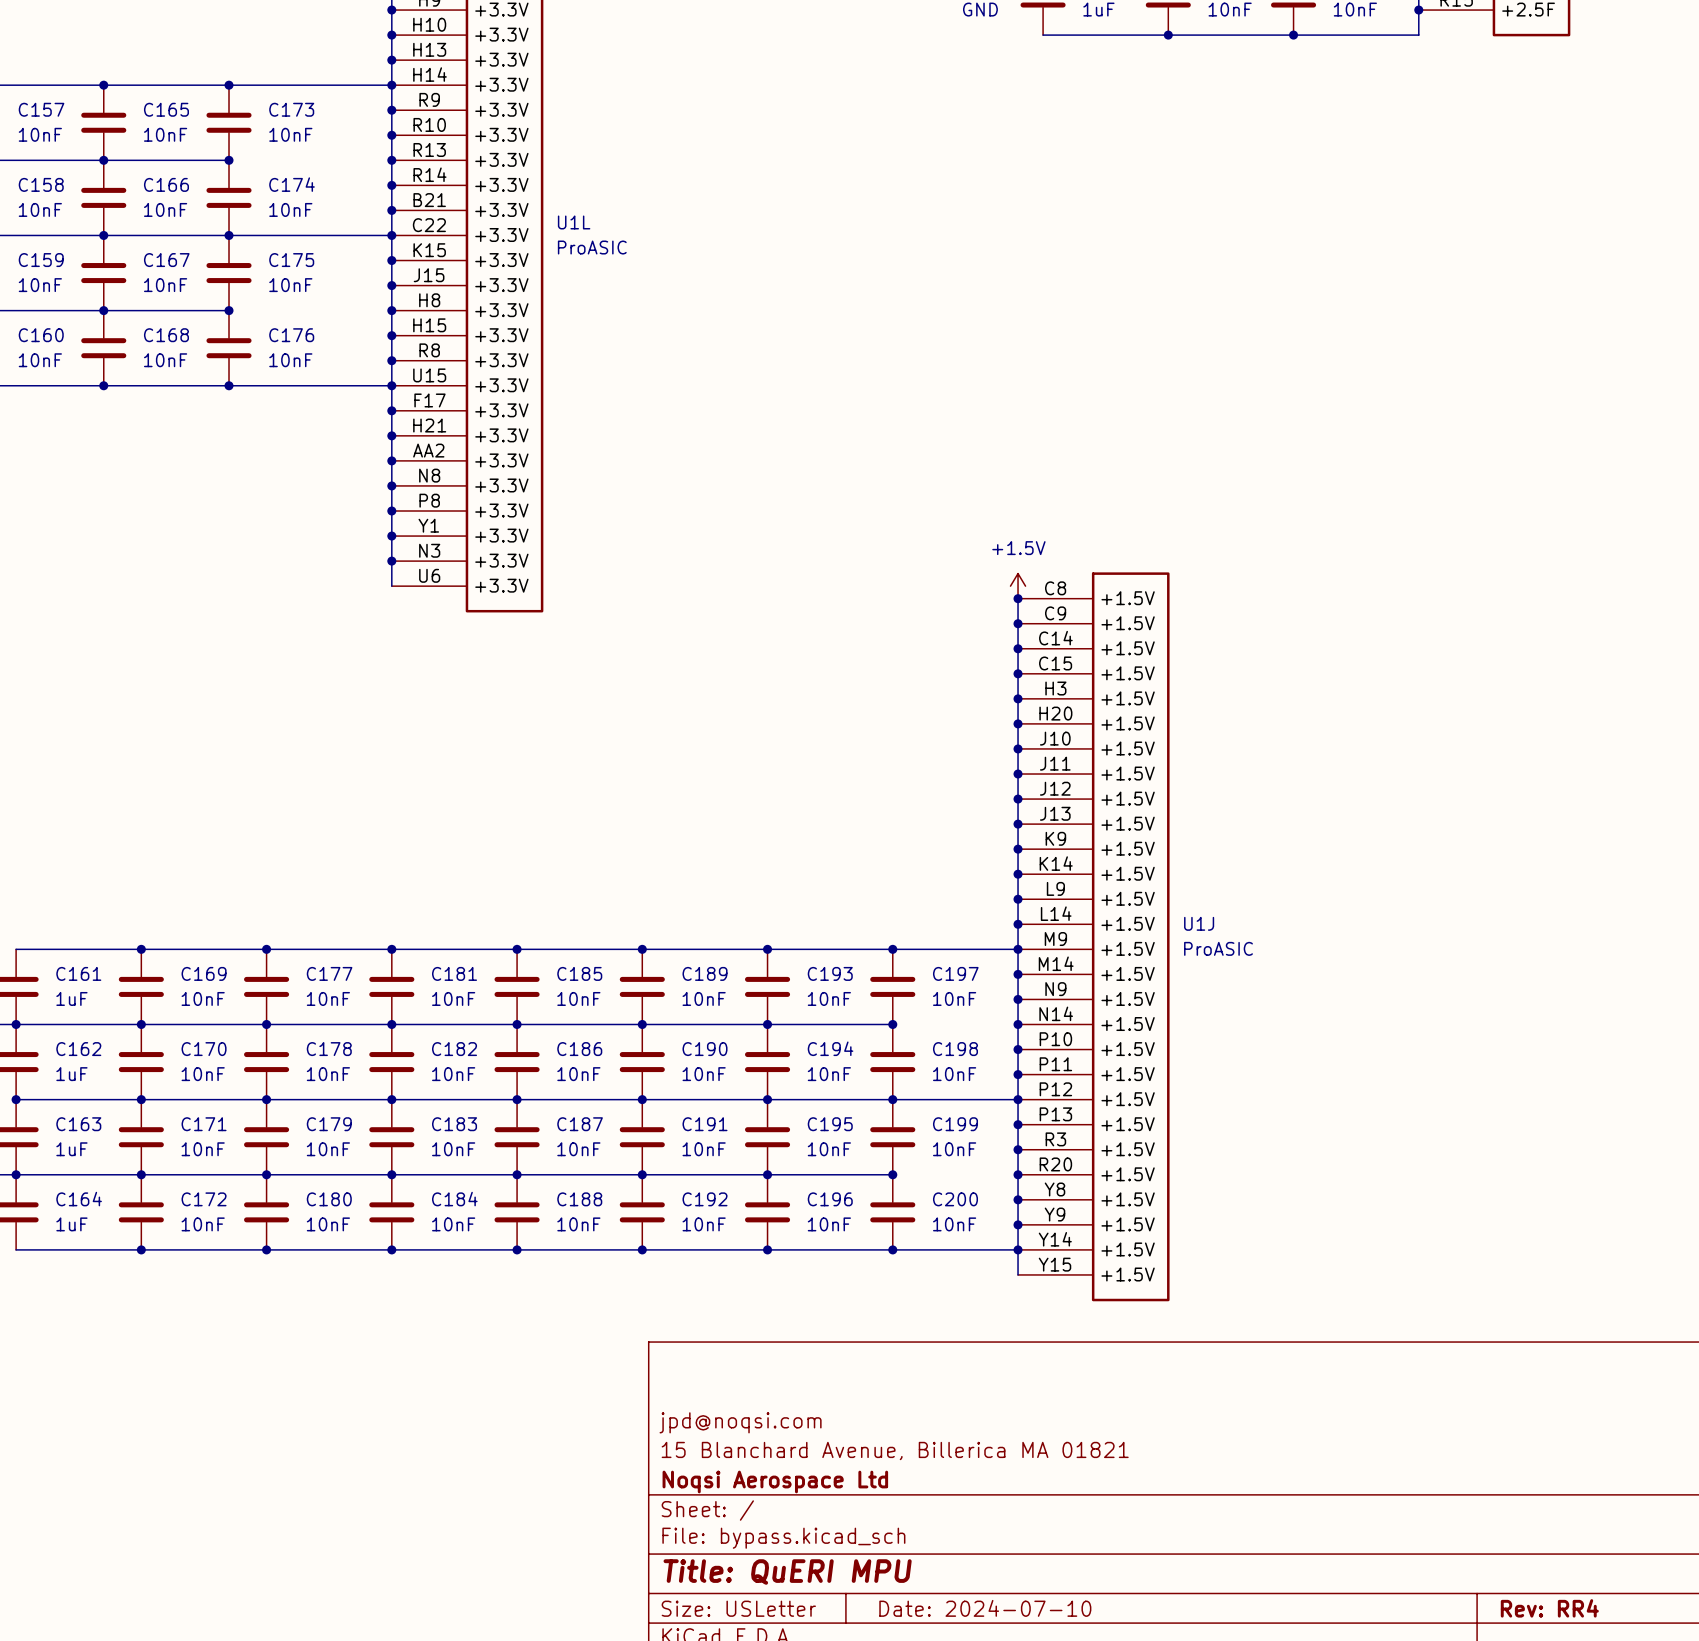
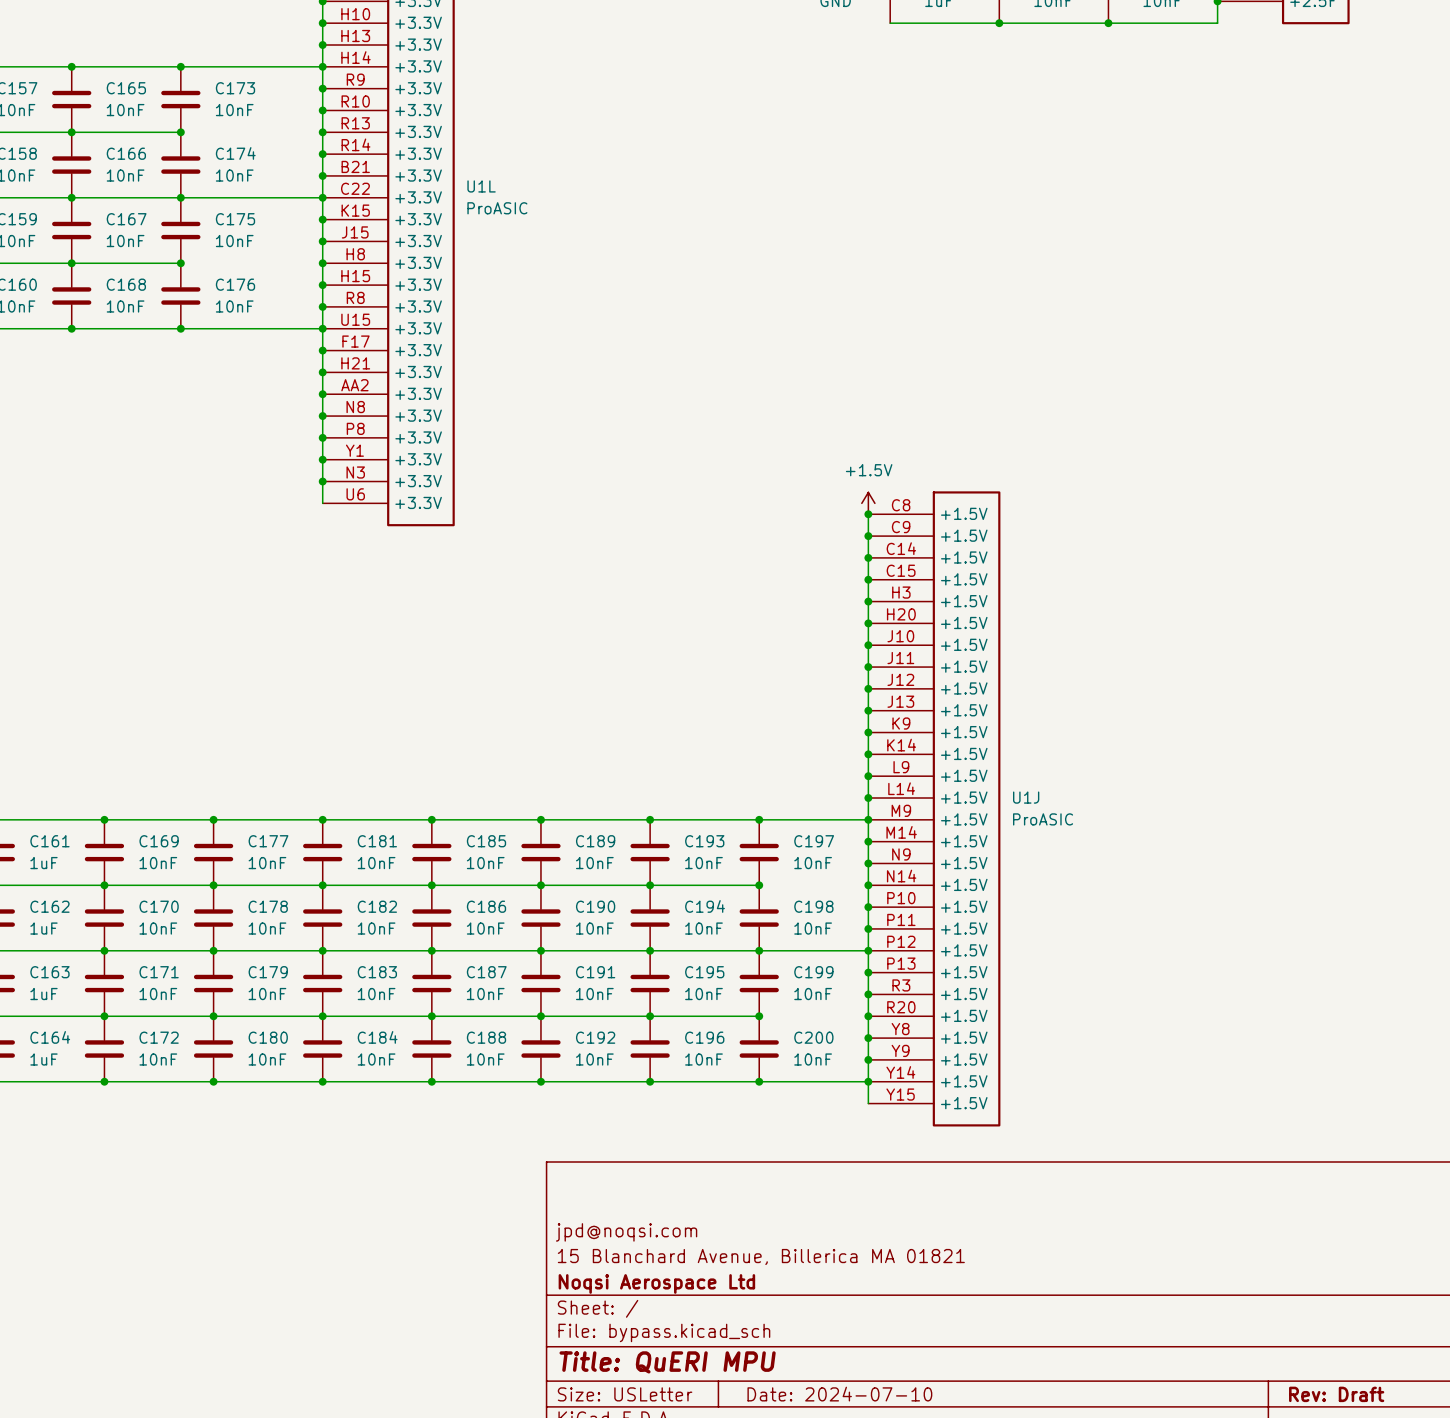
title block: Rev: RR4 (1549, 1608) -> Rev: Draft (1336, 1394)

